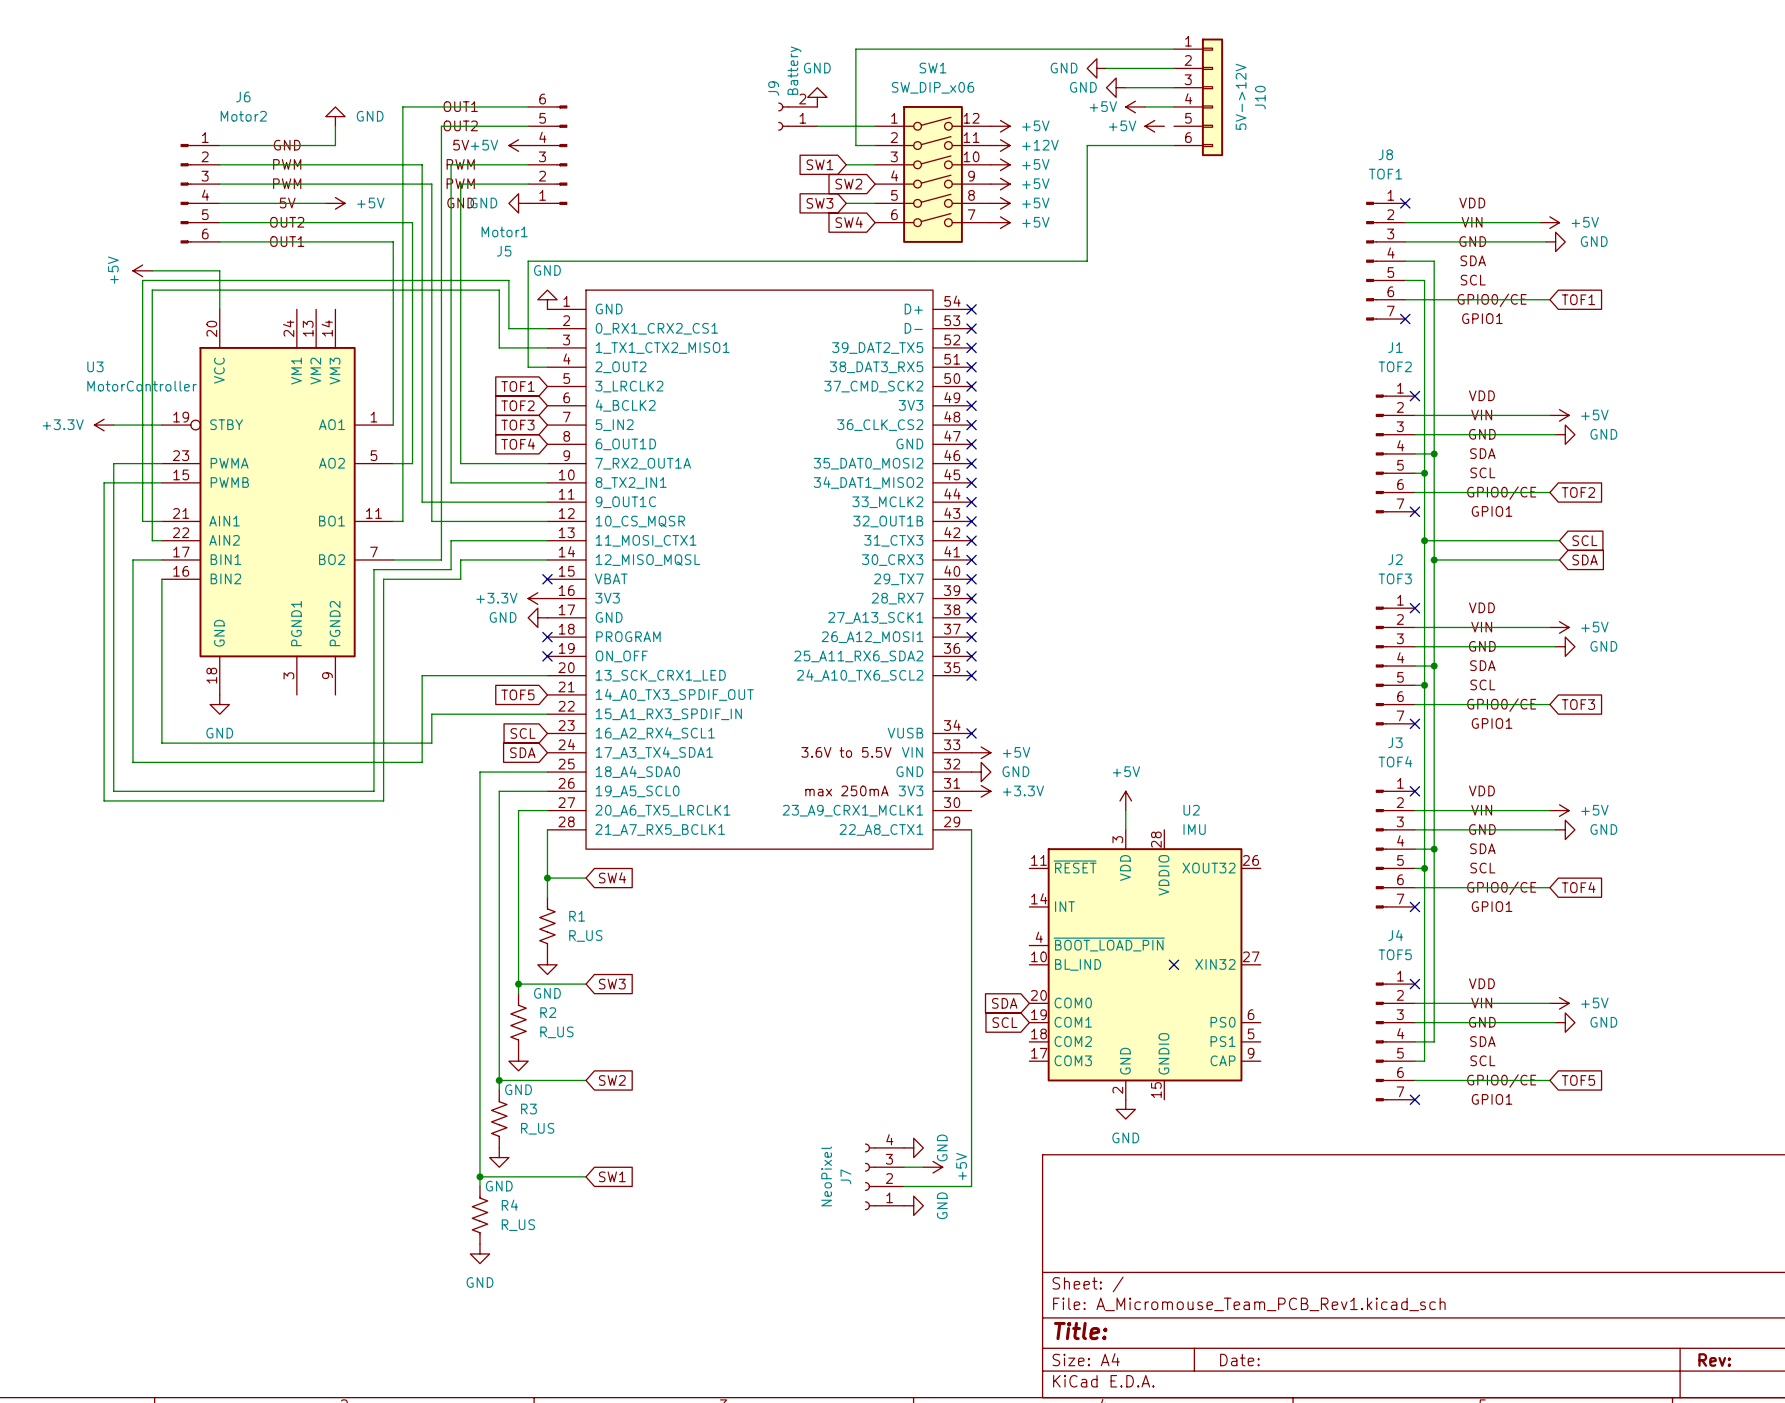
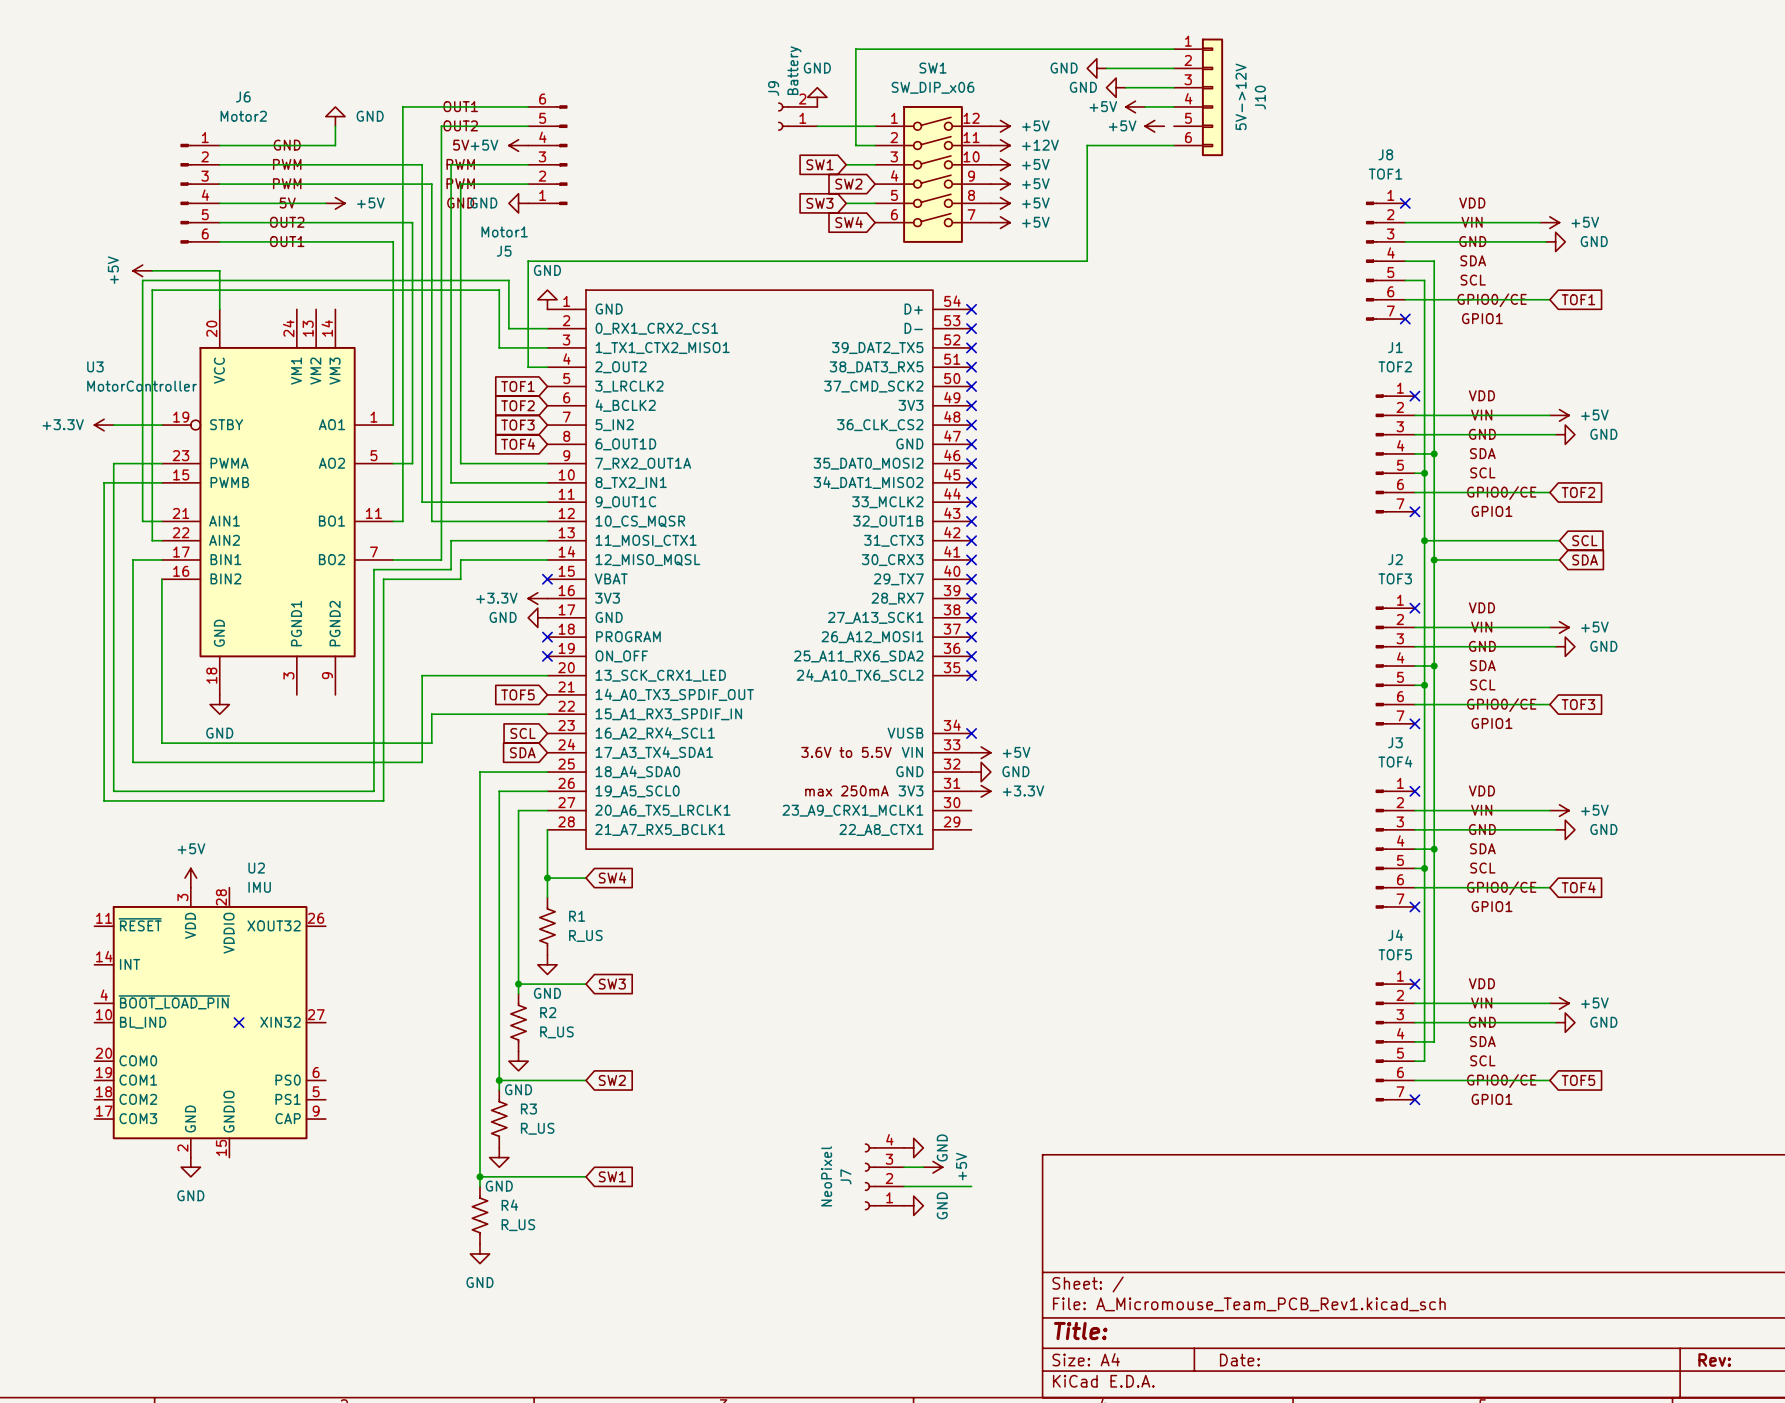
power symbol: +5V (1125, 800) -> none
wire: (1125, 810) (1125, 829) -> none
wire: (971, 829) (971, 1186) -> none
power symbol: none -> +5V (190, 878)
U2 position: (1145, 964) -> (210, 1022)
no-connect mark: (1173, 964) -> none
global label: SDA (1004, 1003) -> none
no-connect mark: none -> (239, 1022)
global label: SCL (1004, 1022) -> none
power symbol: GND (1125, 1109) -> none
power symbol: none -> GND (190, 1167)

